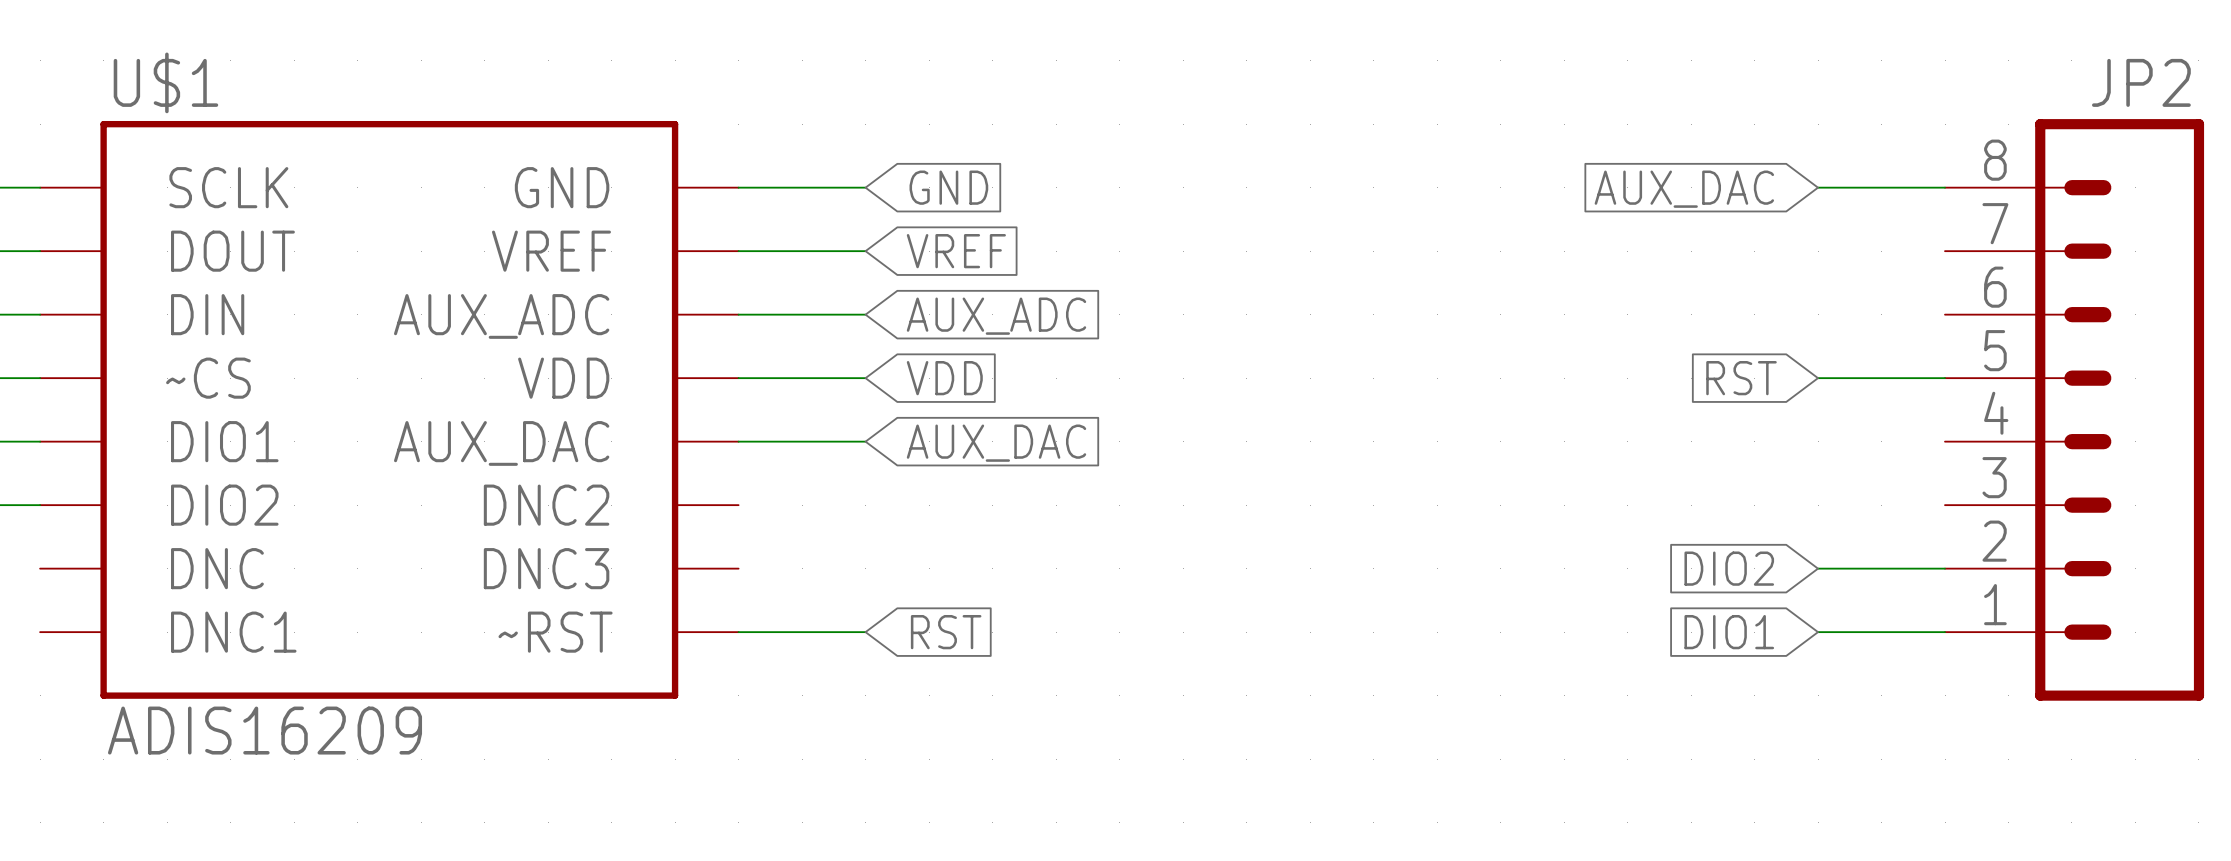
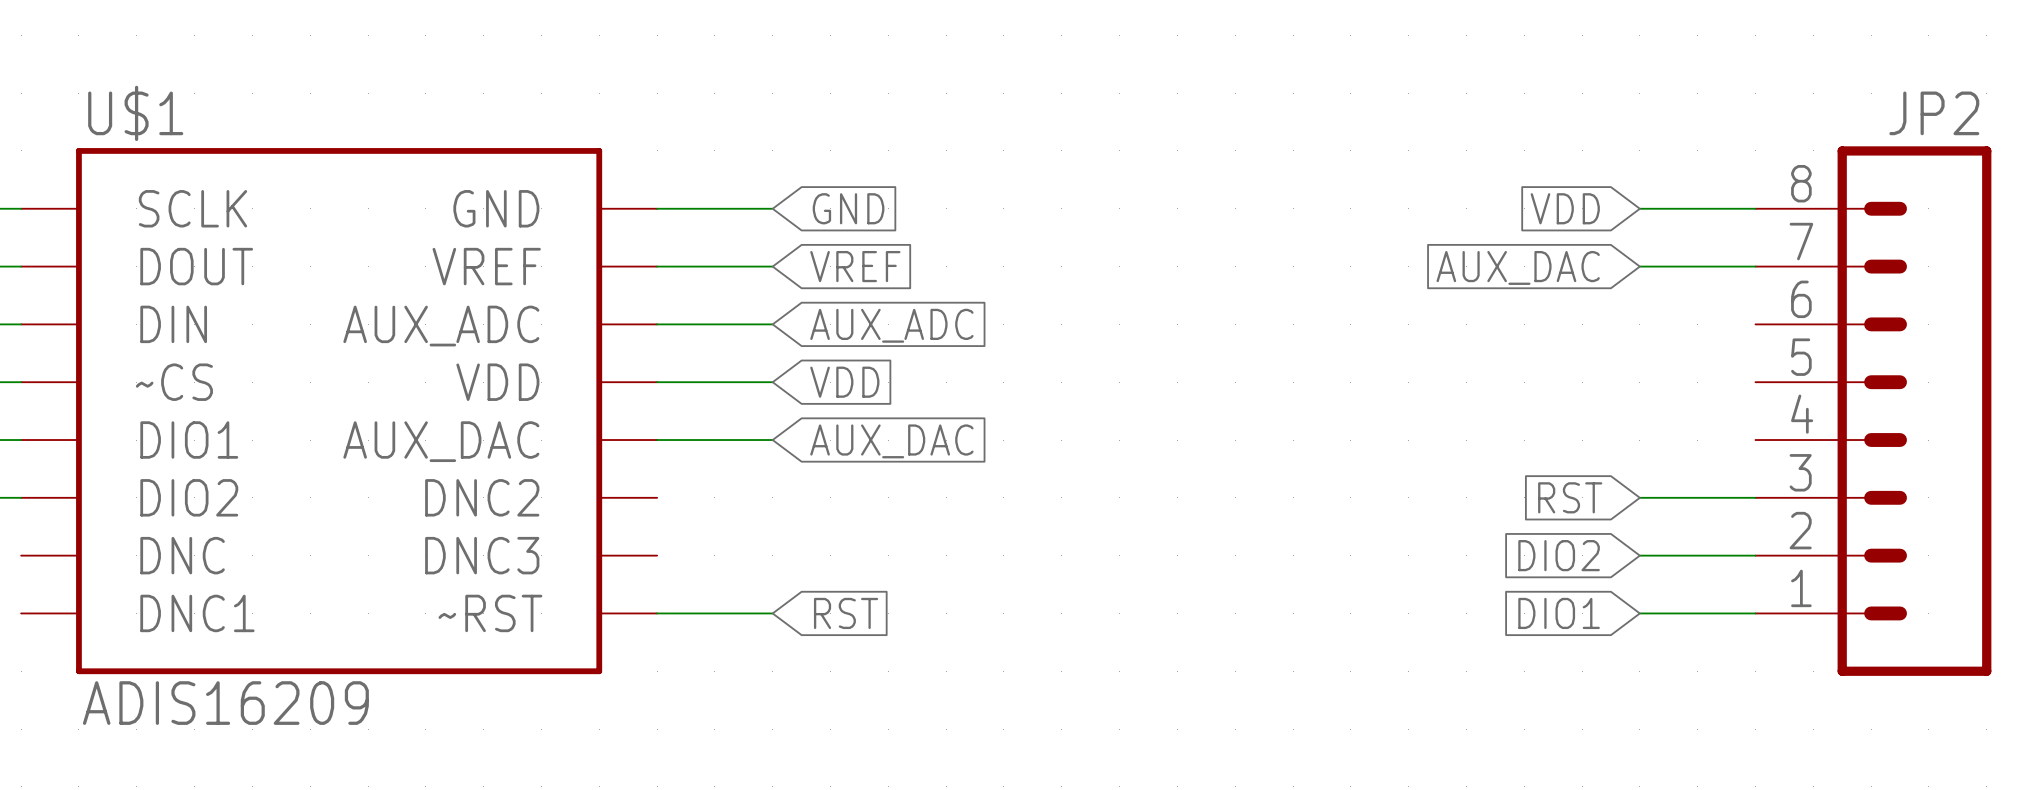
global label: AUX_DAC (1684, 189) -> VDD (1565, 208)
global label: none -> AUX_DAC (1518, 267)
global label position: RST (1741, 378) -> RST (1570, 497)
wire: (1818, 378) (1945, 378) -> (1639, 266) (1755, 266)
wire: none -> (1639, 497) (1755, 497)

